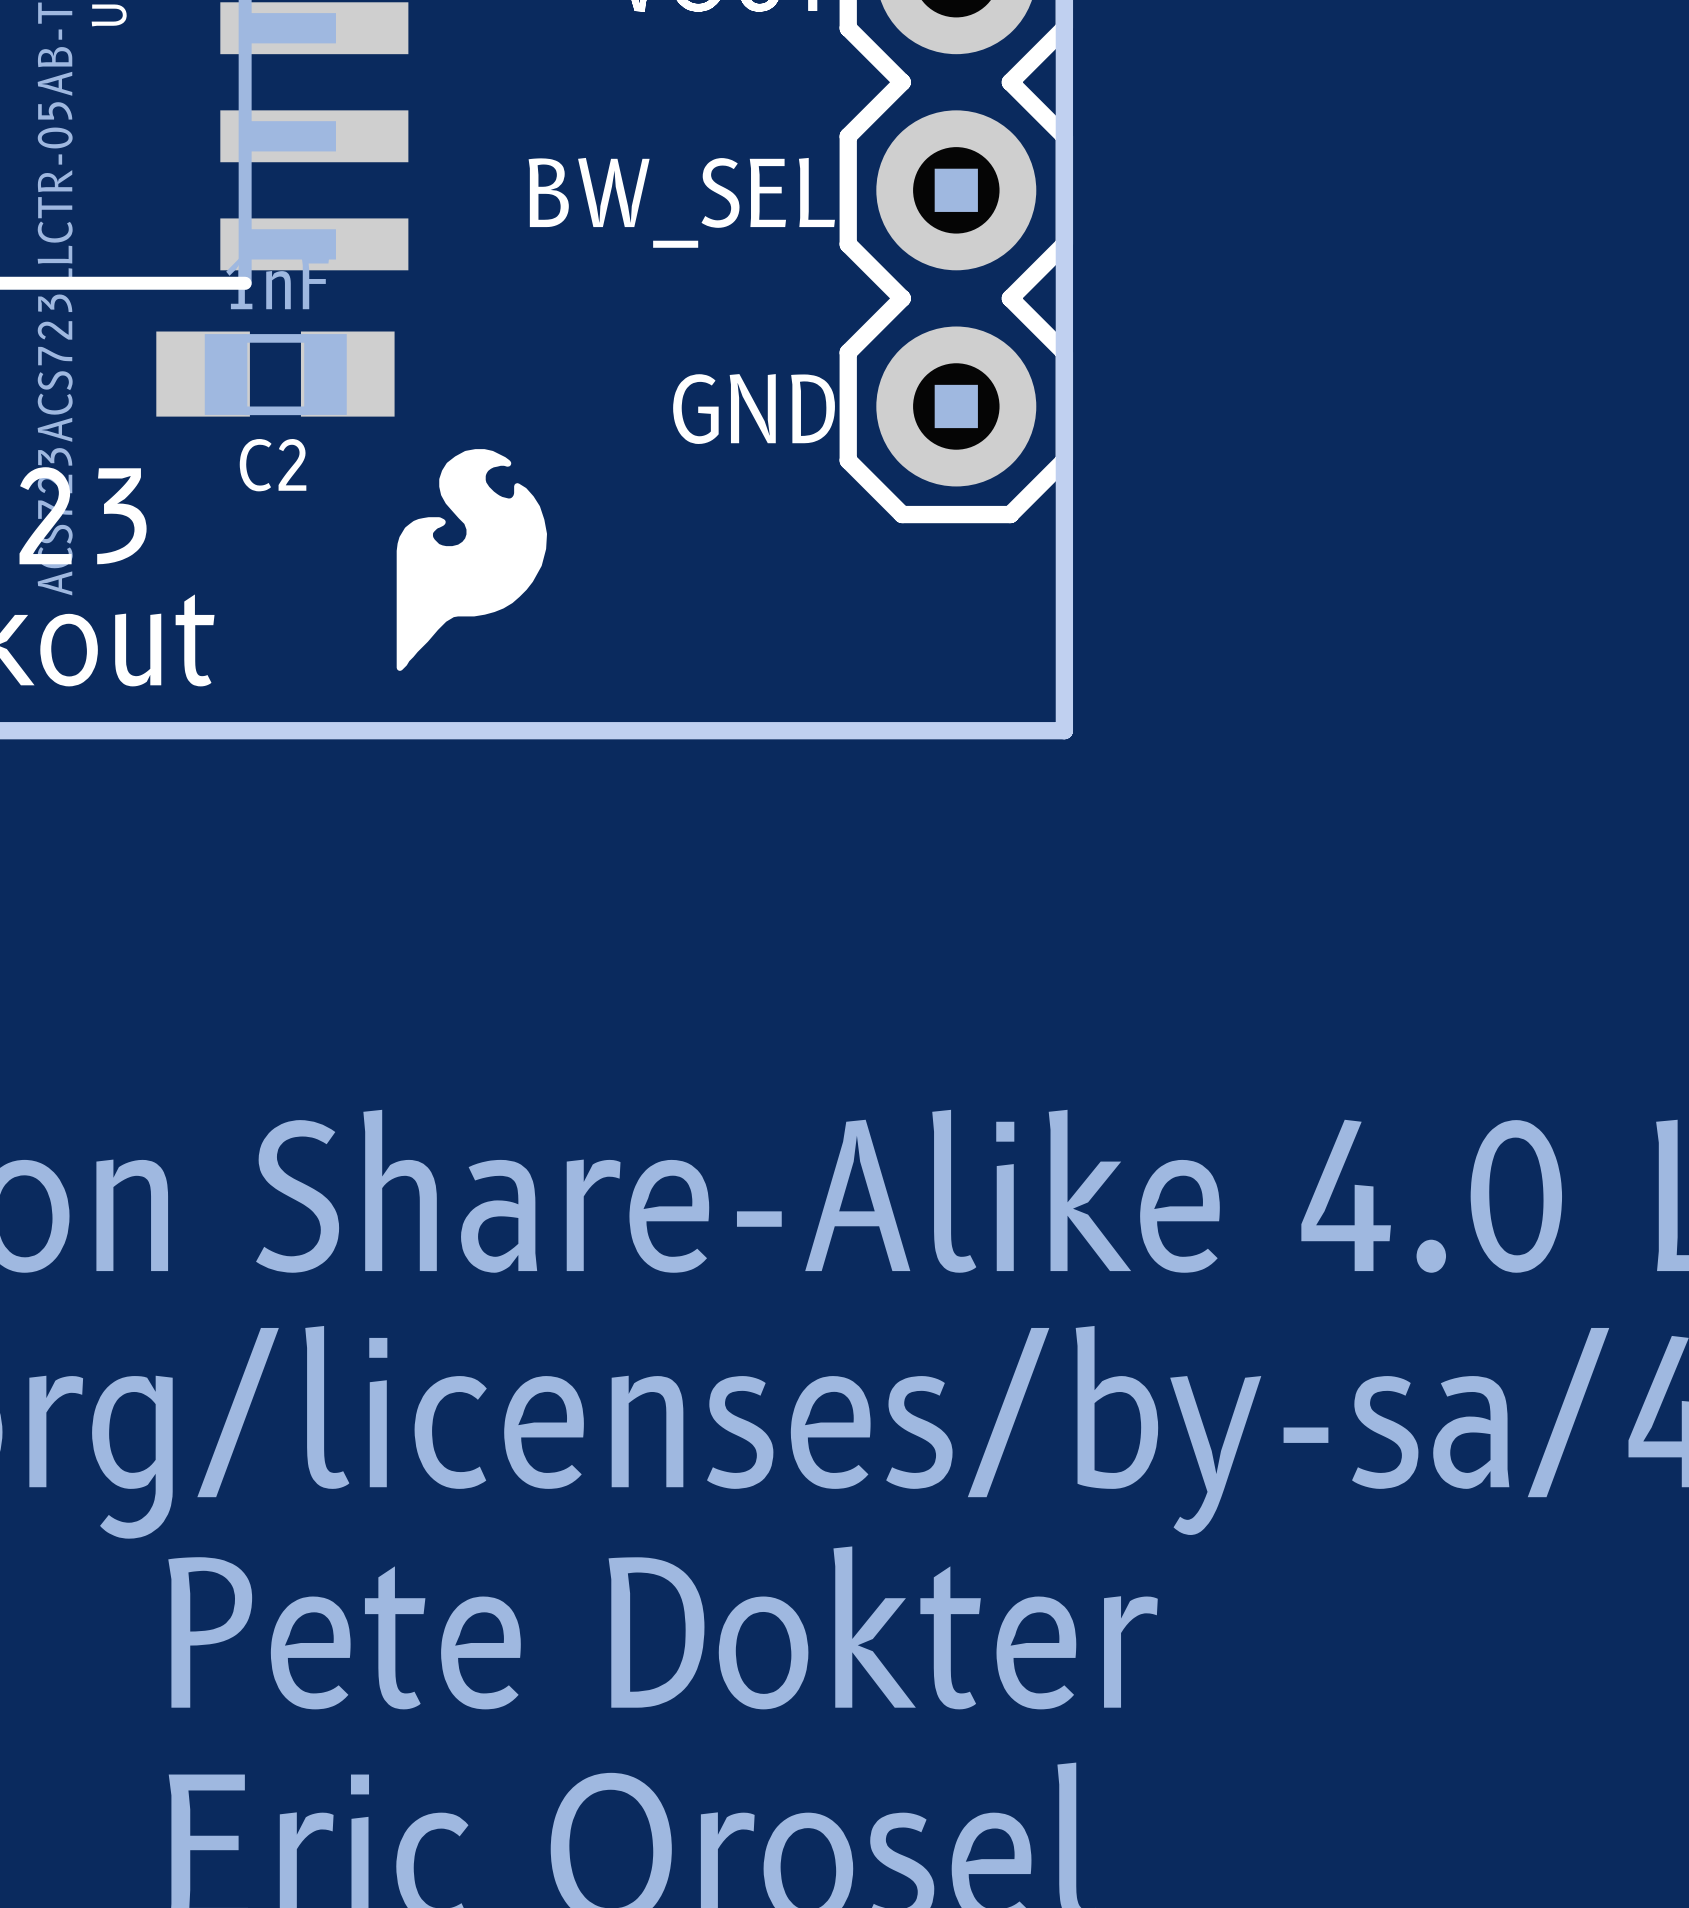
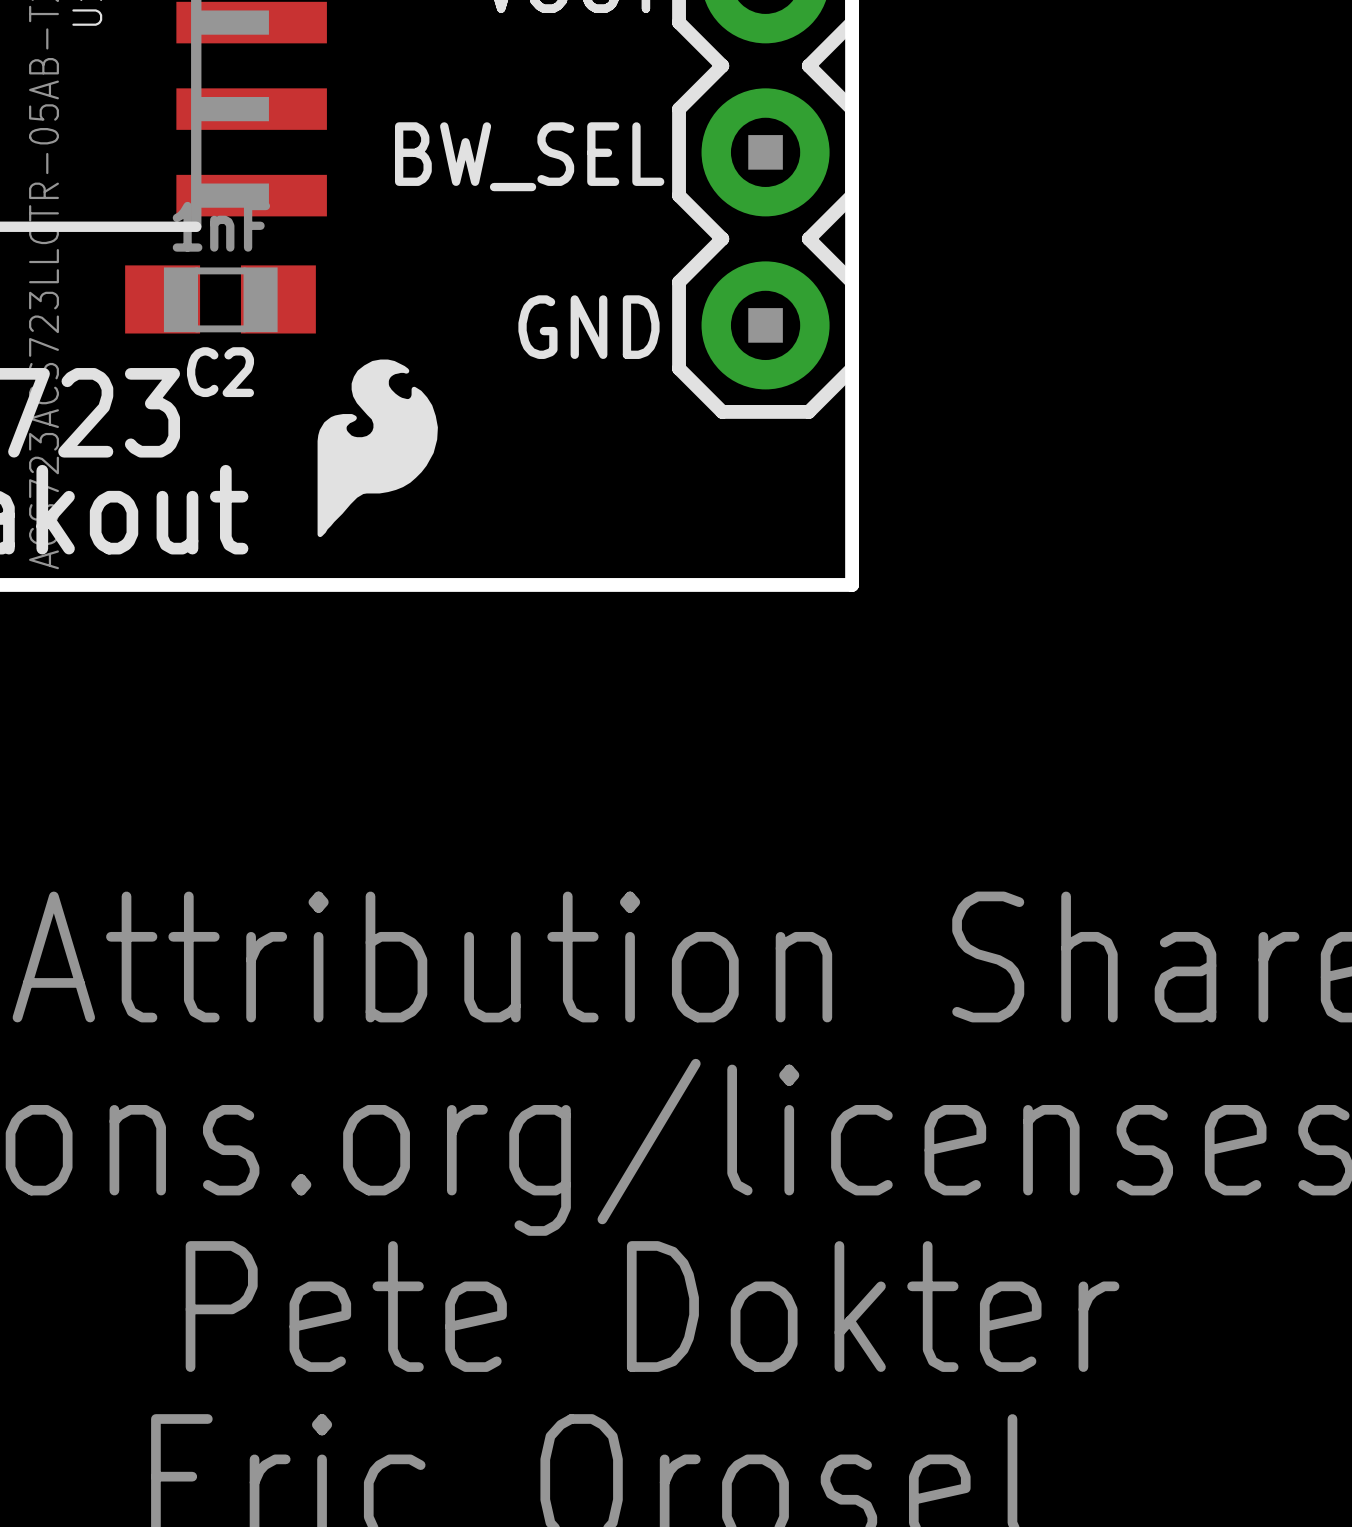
text position: Pete Dokter (663, 1627) -> Pete Dokter (652, 1306)

